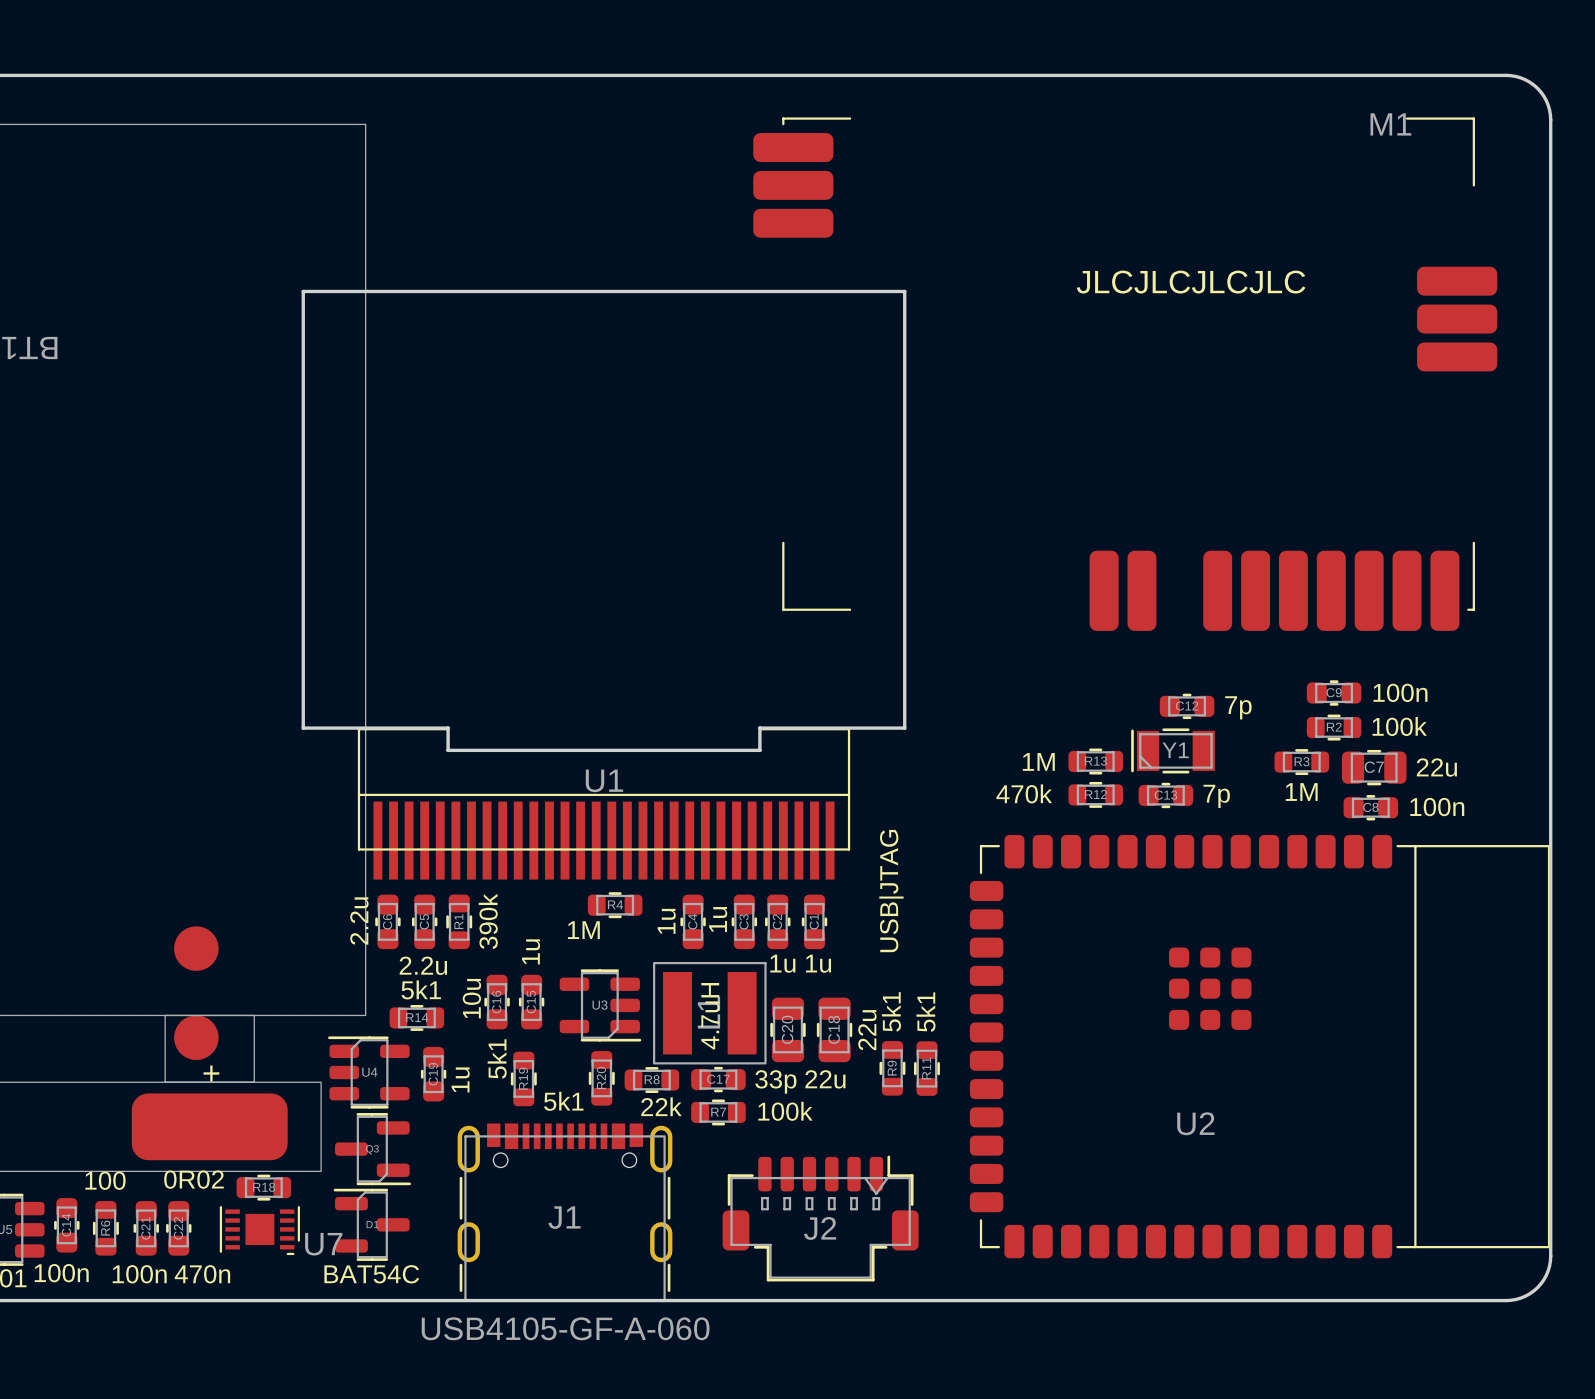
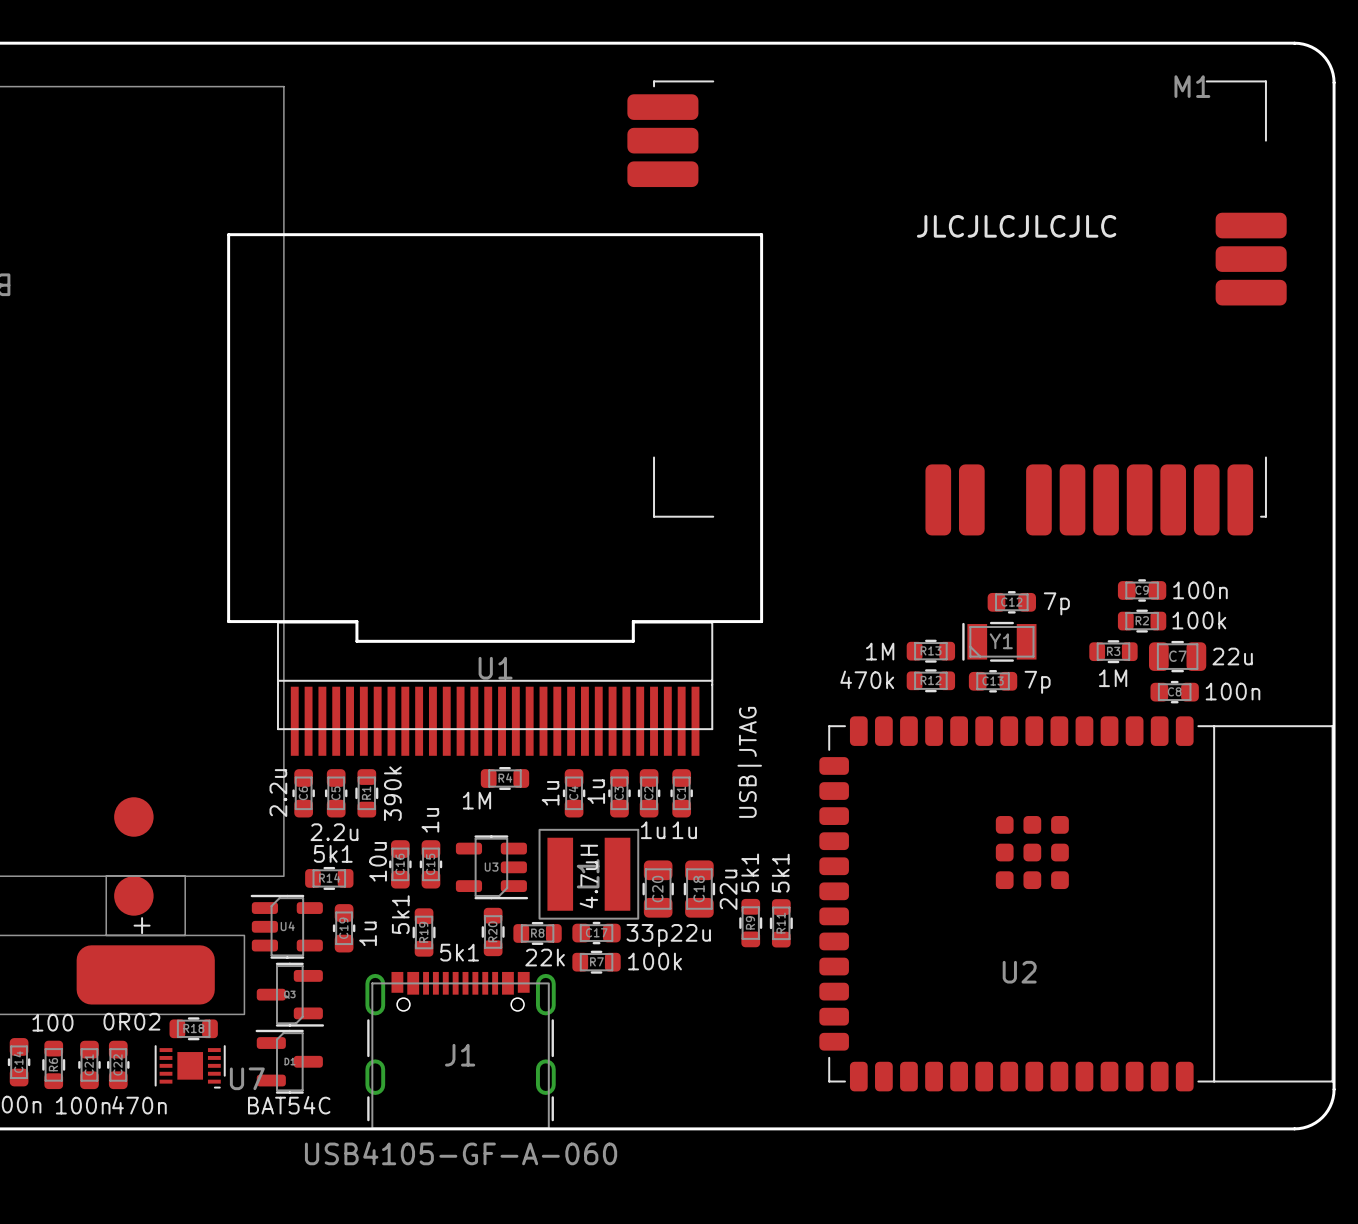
J2: (820, 1218) -> none

